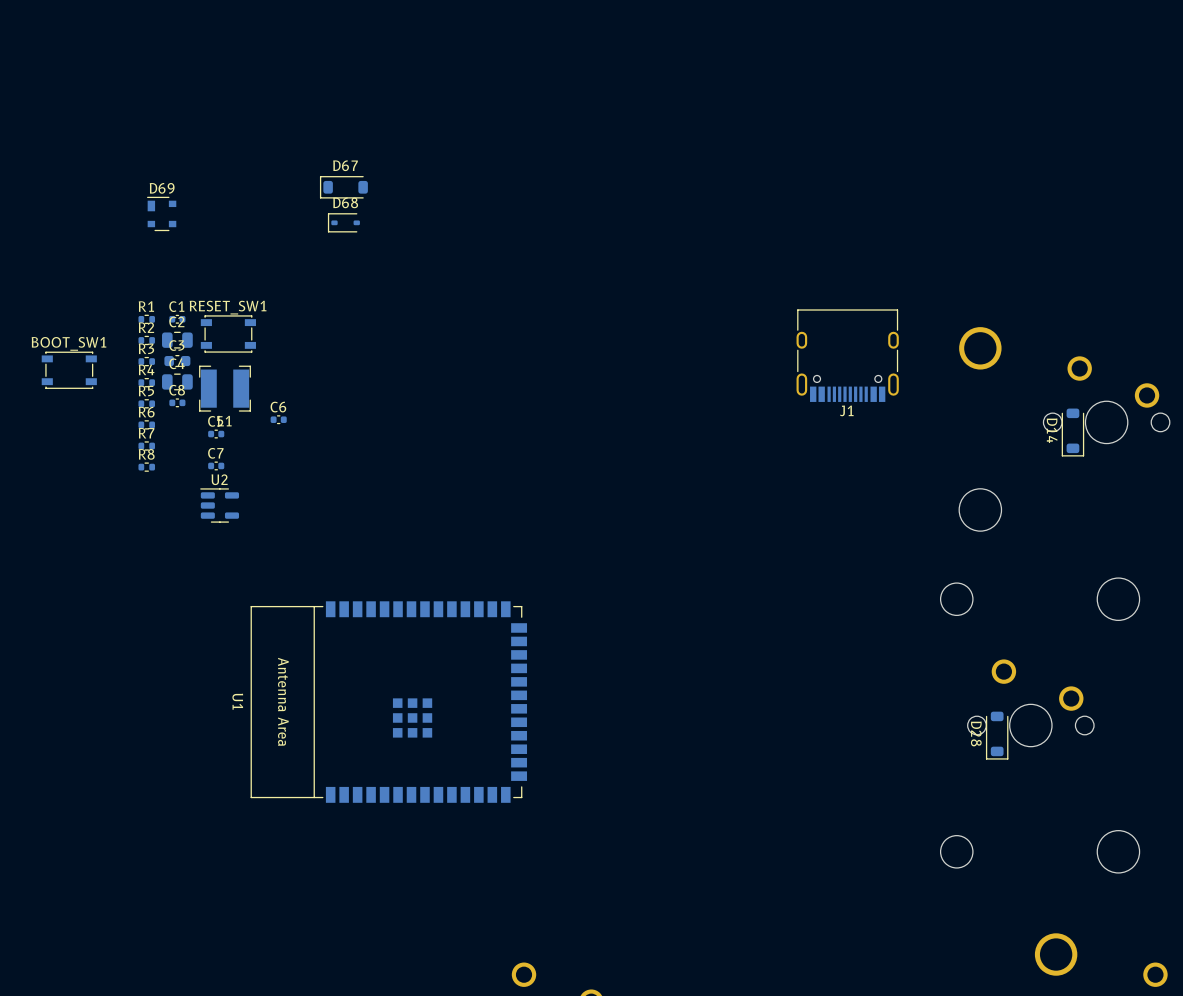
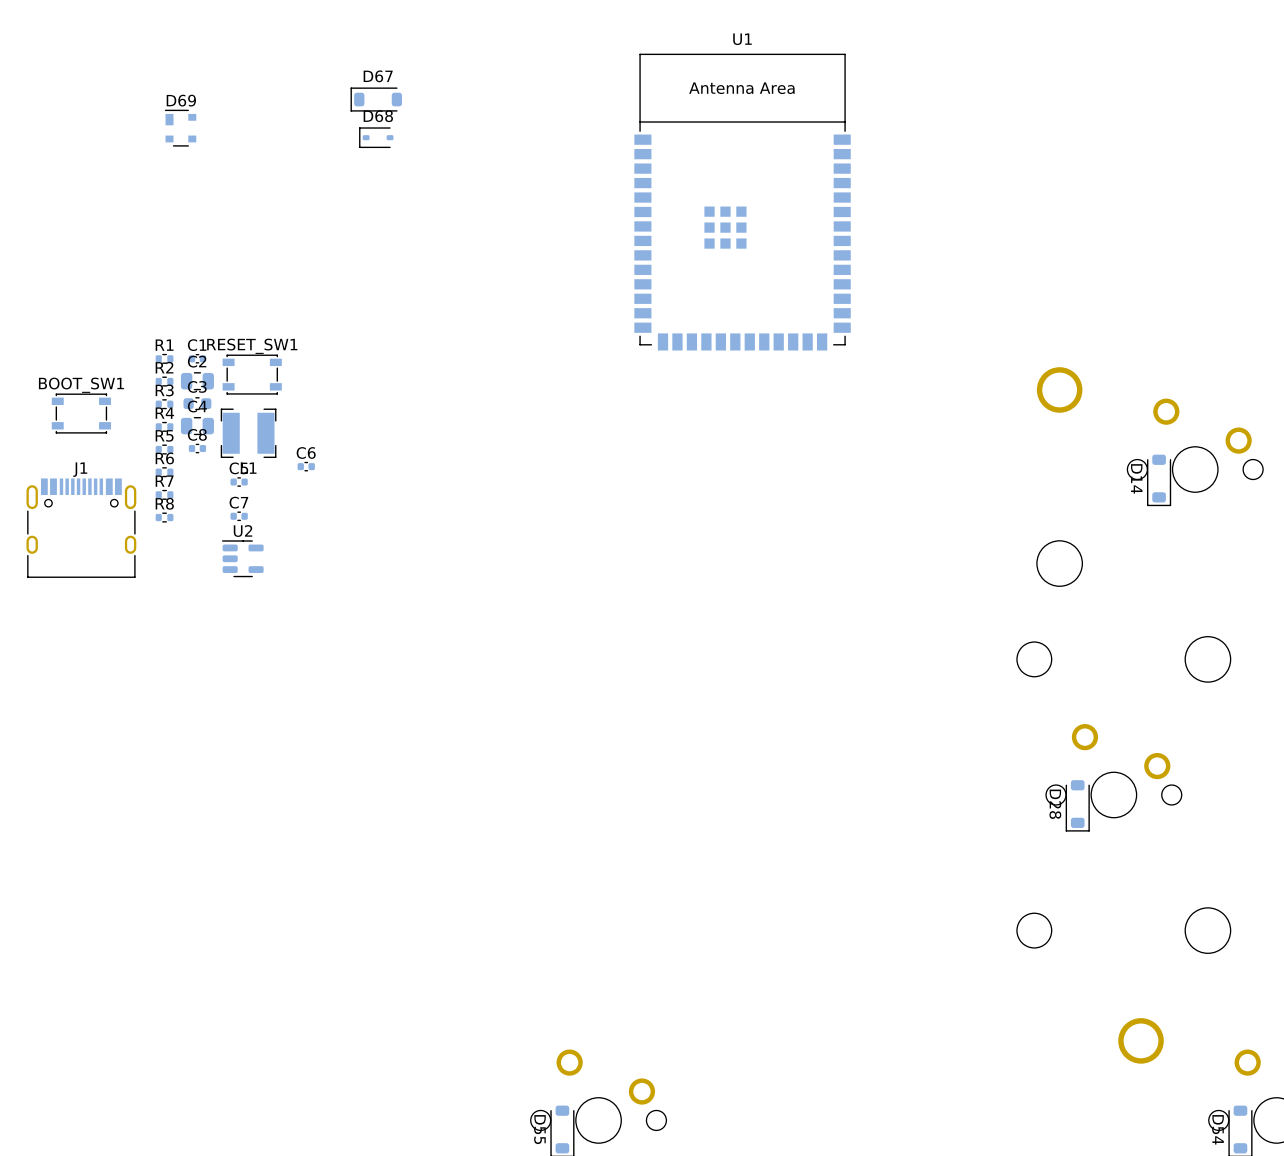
D67 position: (343, 187) -> (376, 99)
D69 position: (161, 213) -> (180, 128)
D68 position: (343, 222) -> (376, 137)
J1 rotation: 0° (847, 355) -> 180° (81, 528)
J1 position: (847, 355) -> (81, 528)
U1 rotation: 0° (388, 702) -> 90° clockwise (742, 202)
U1 position: (388, 702) -> (742, 202)

